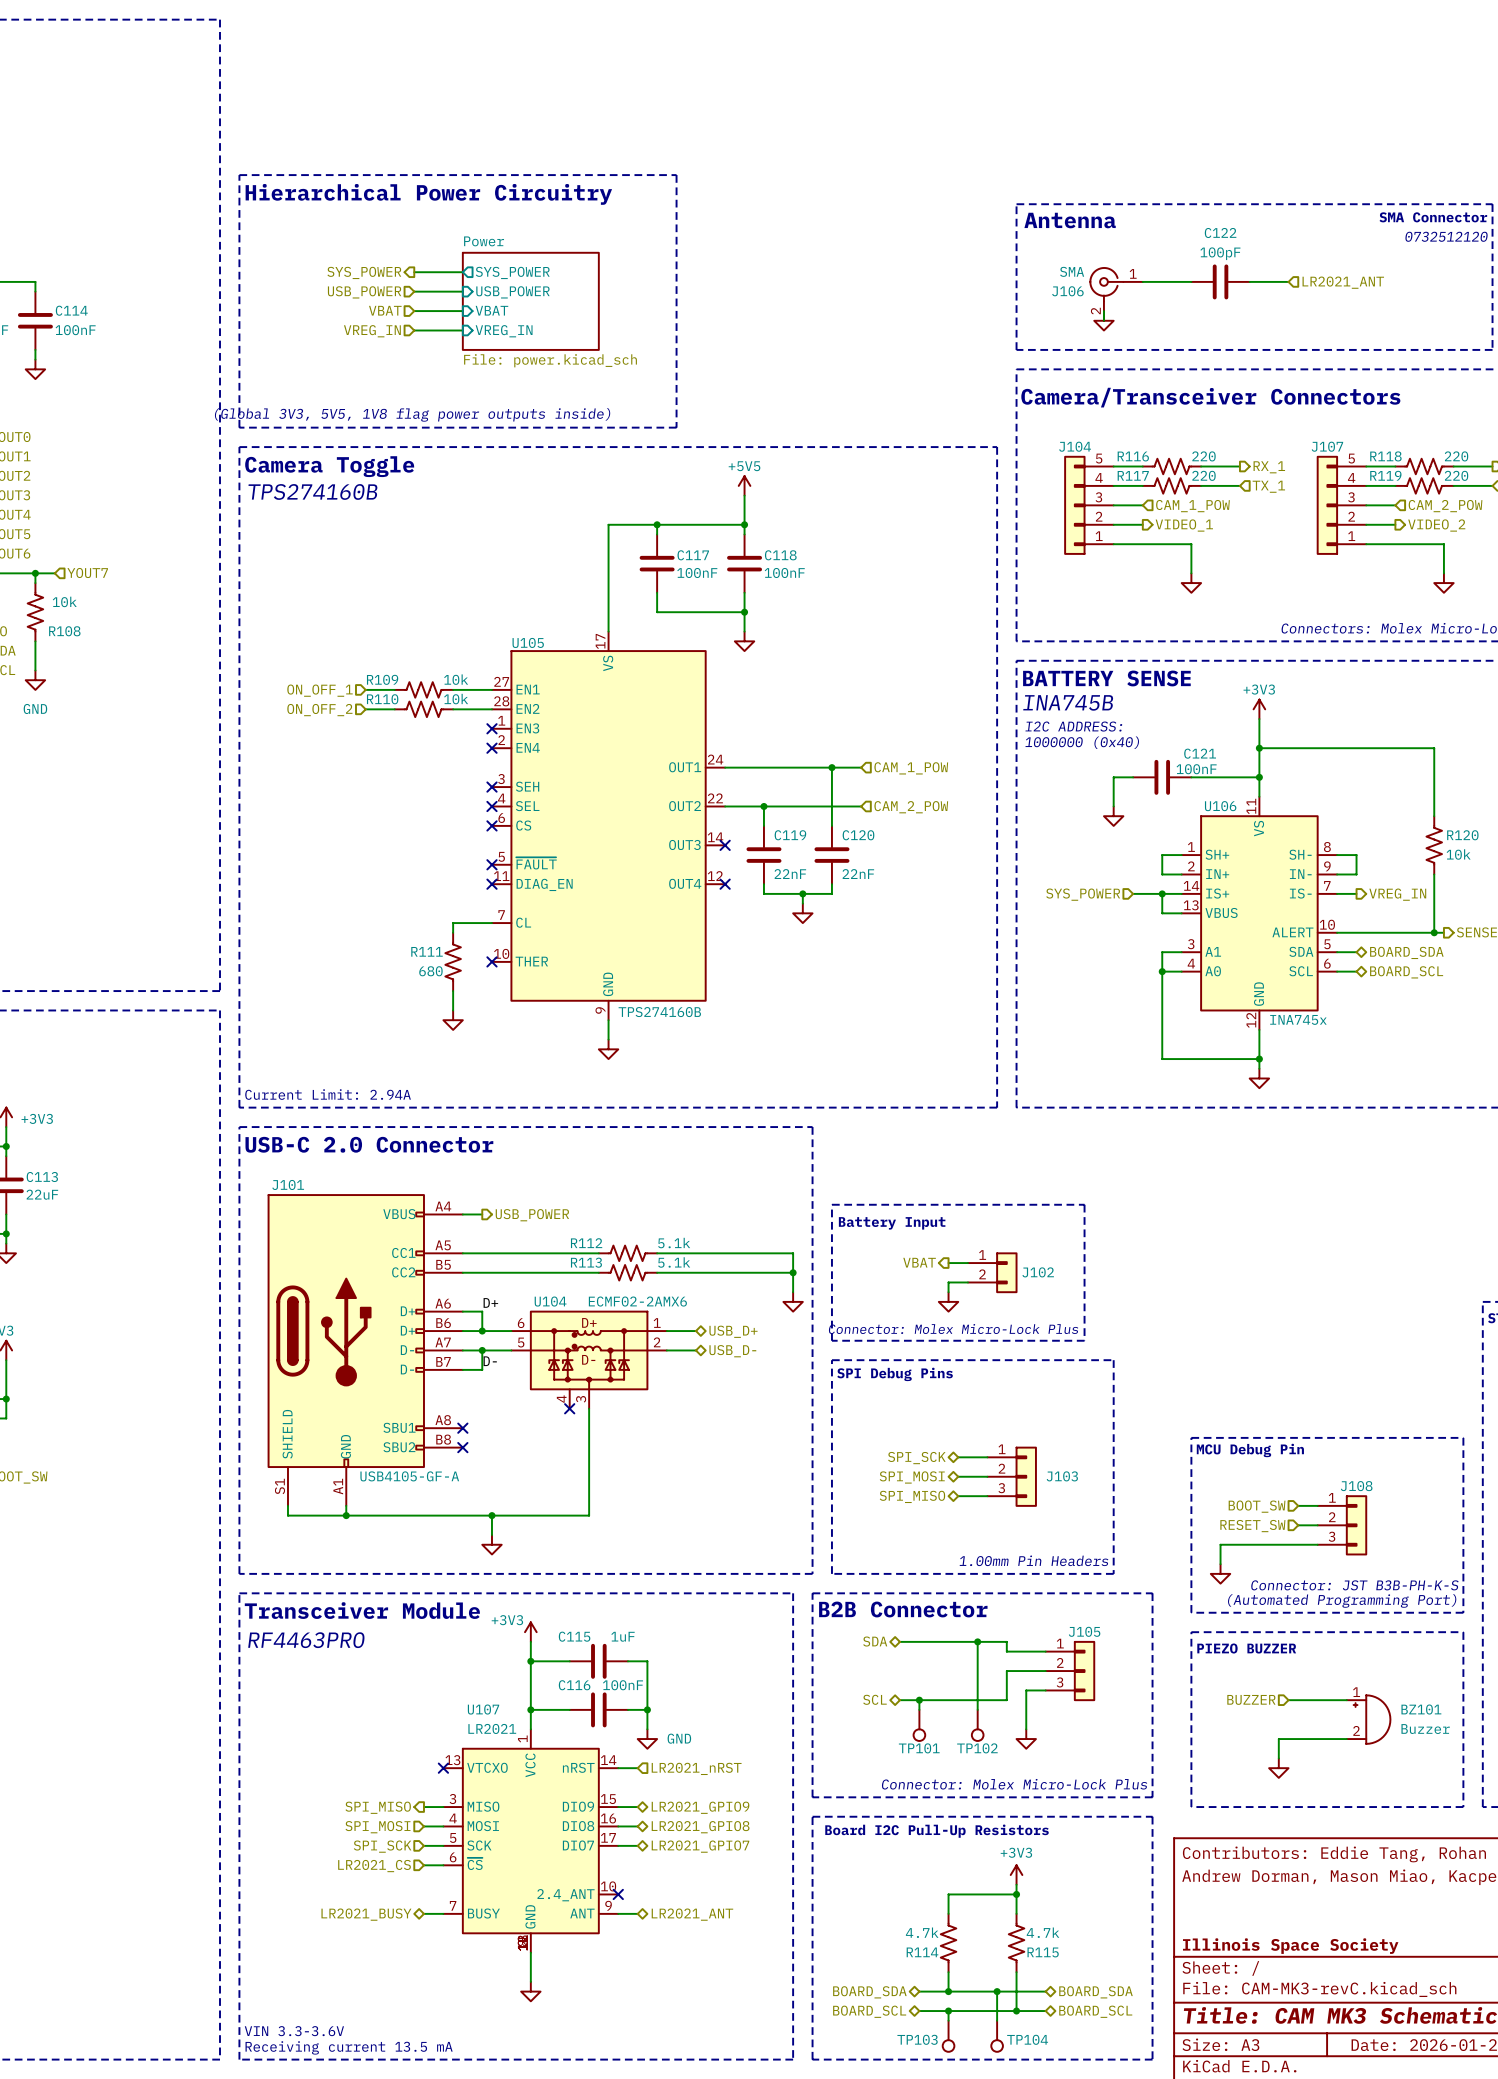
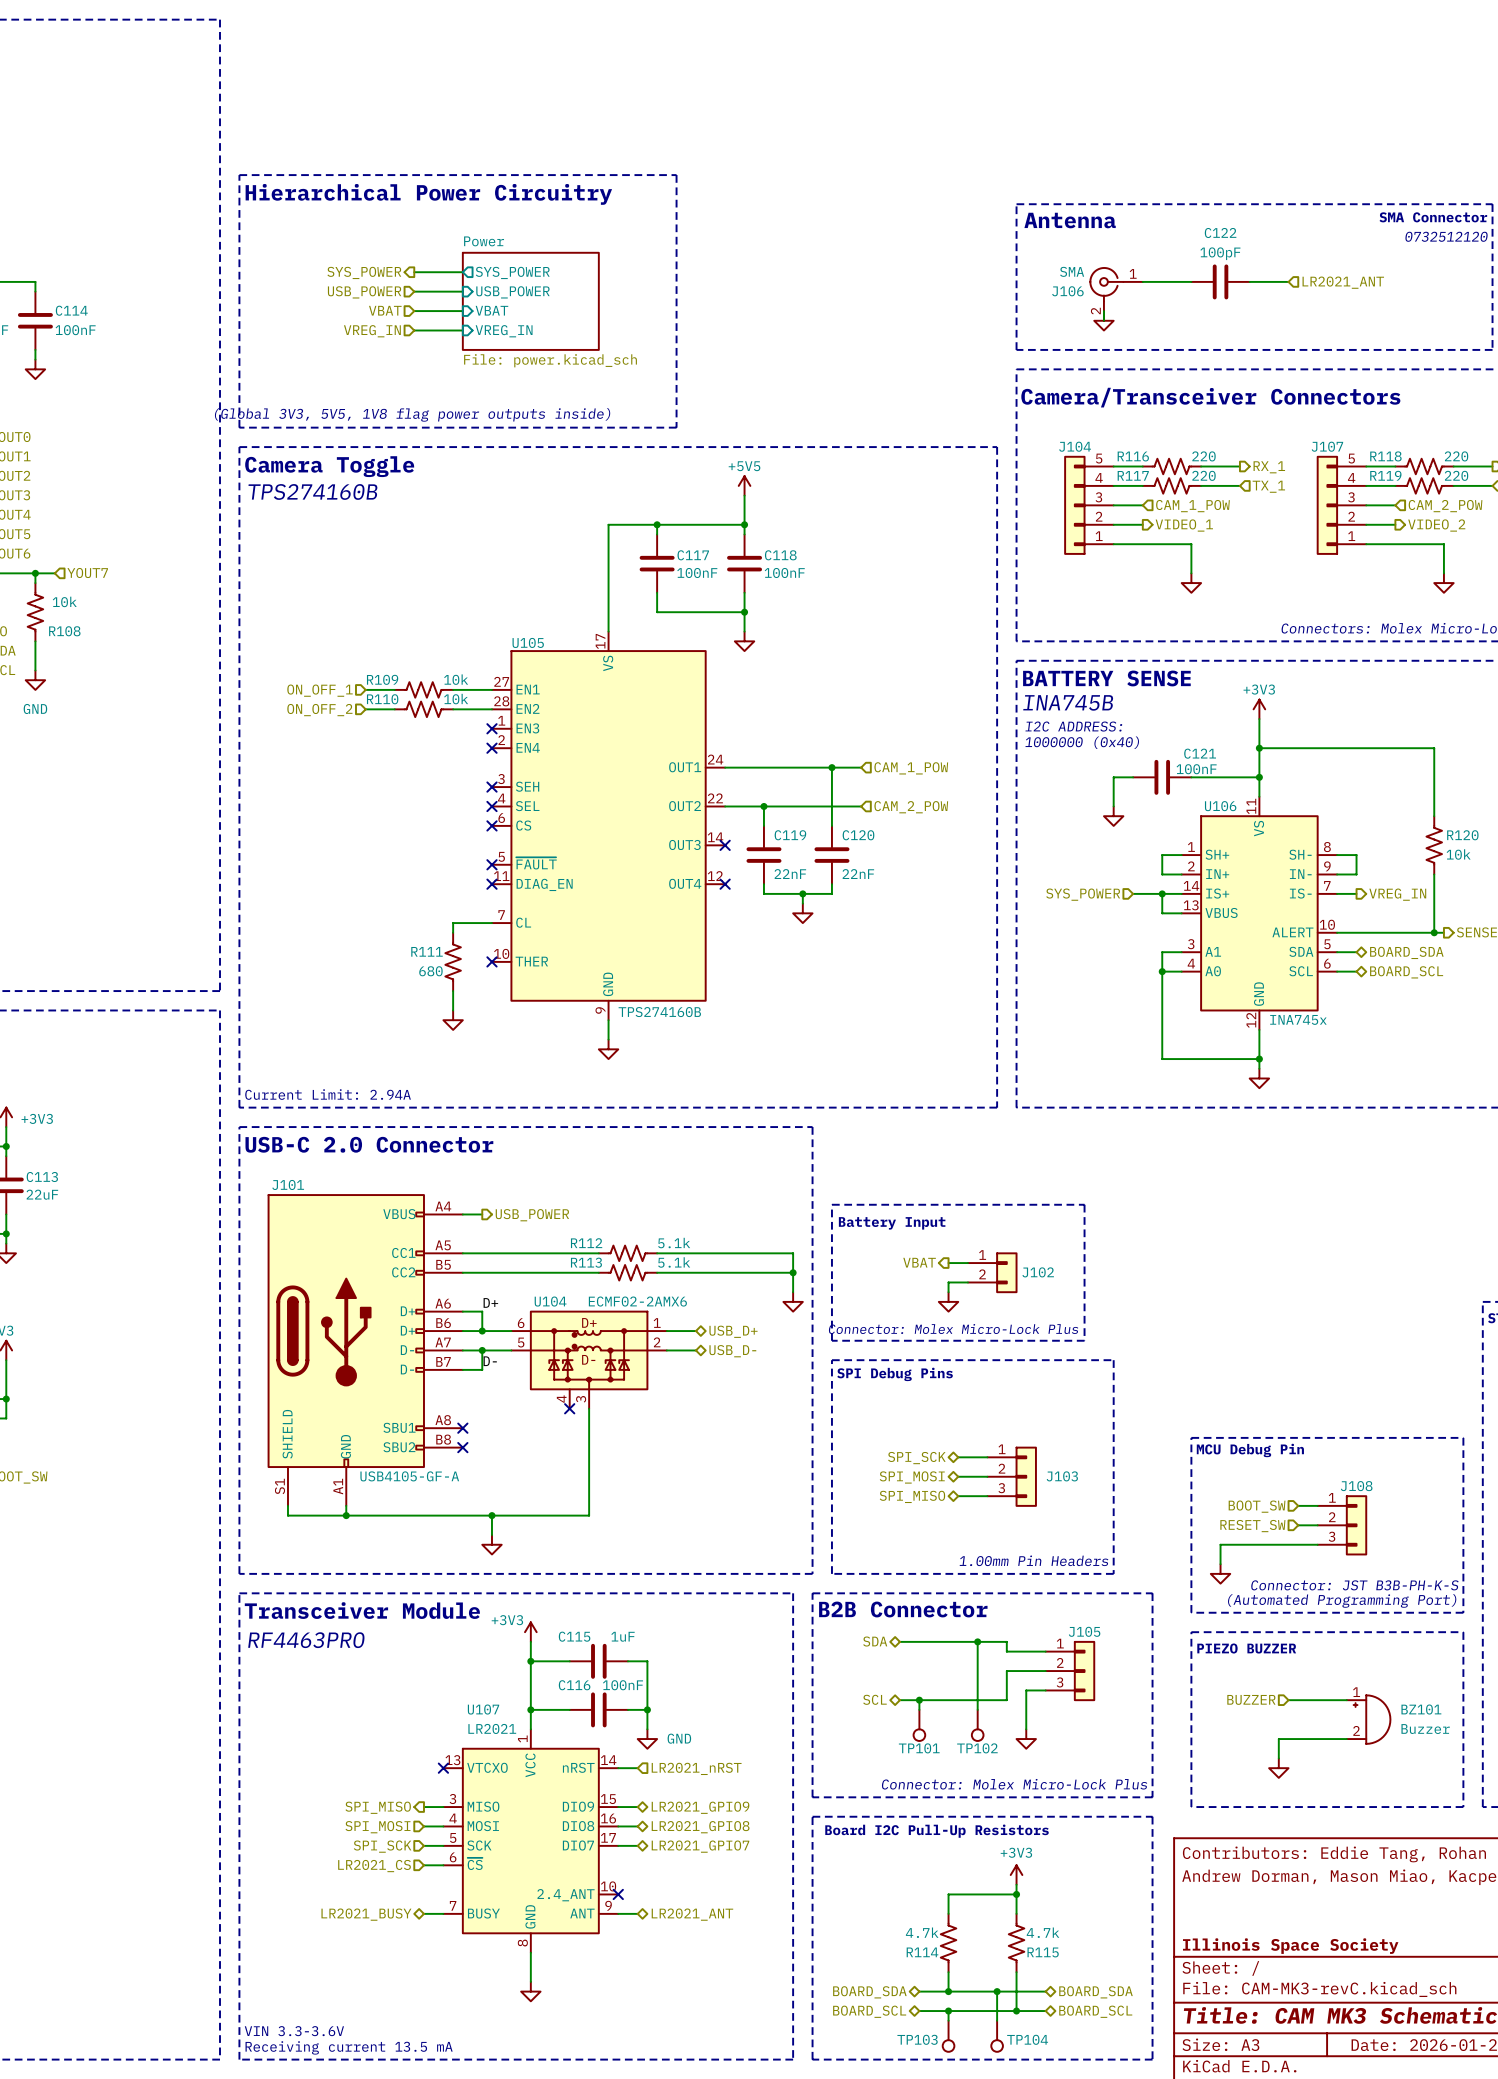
U107 symbol: [443, 1729, 619, 1953] -> [443, 1729, 619, 1953]

